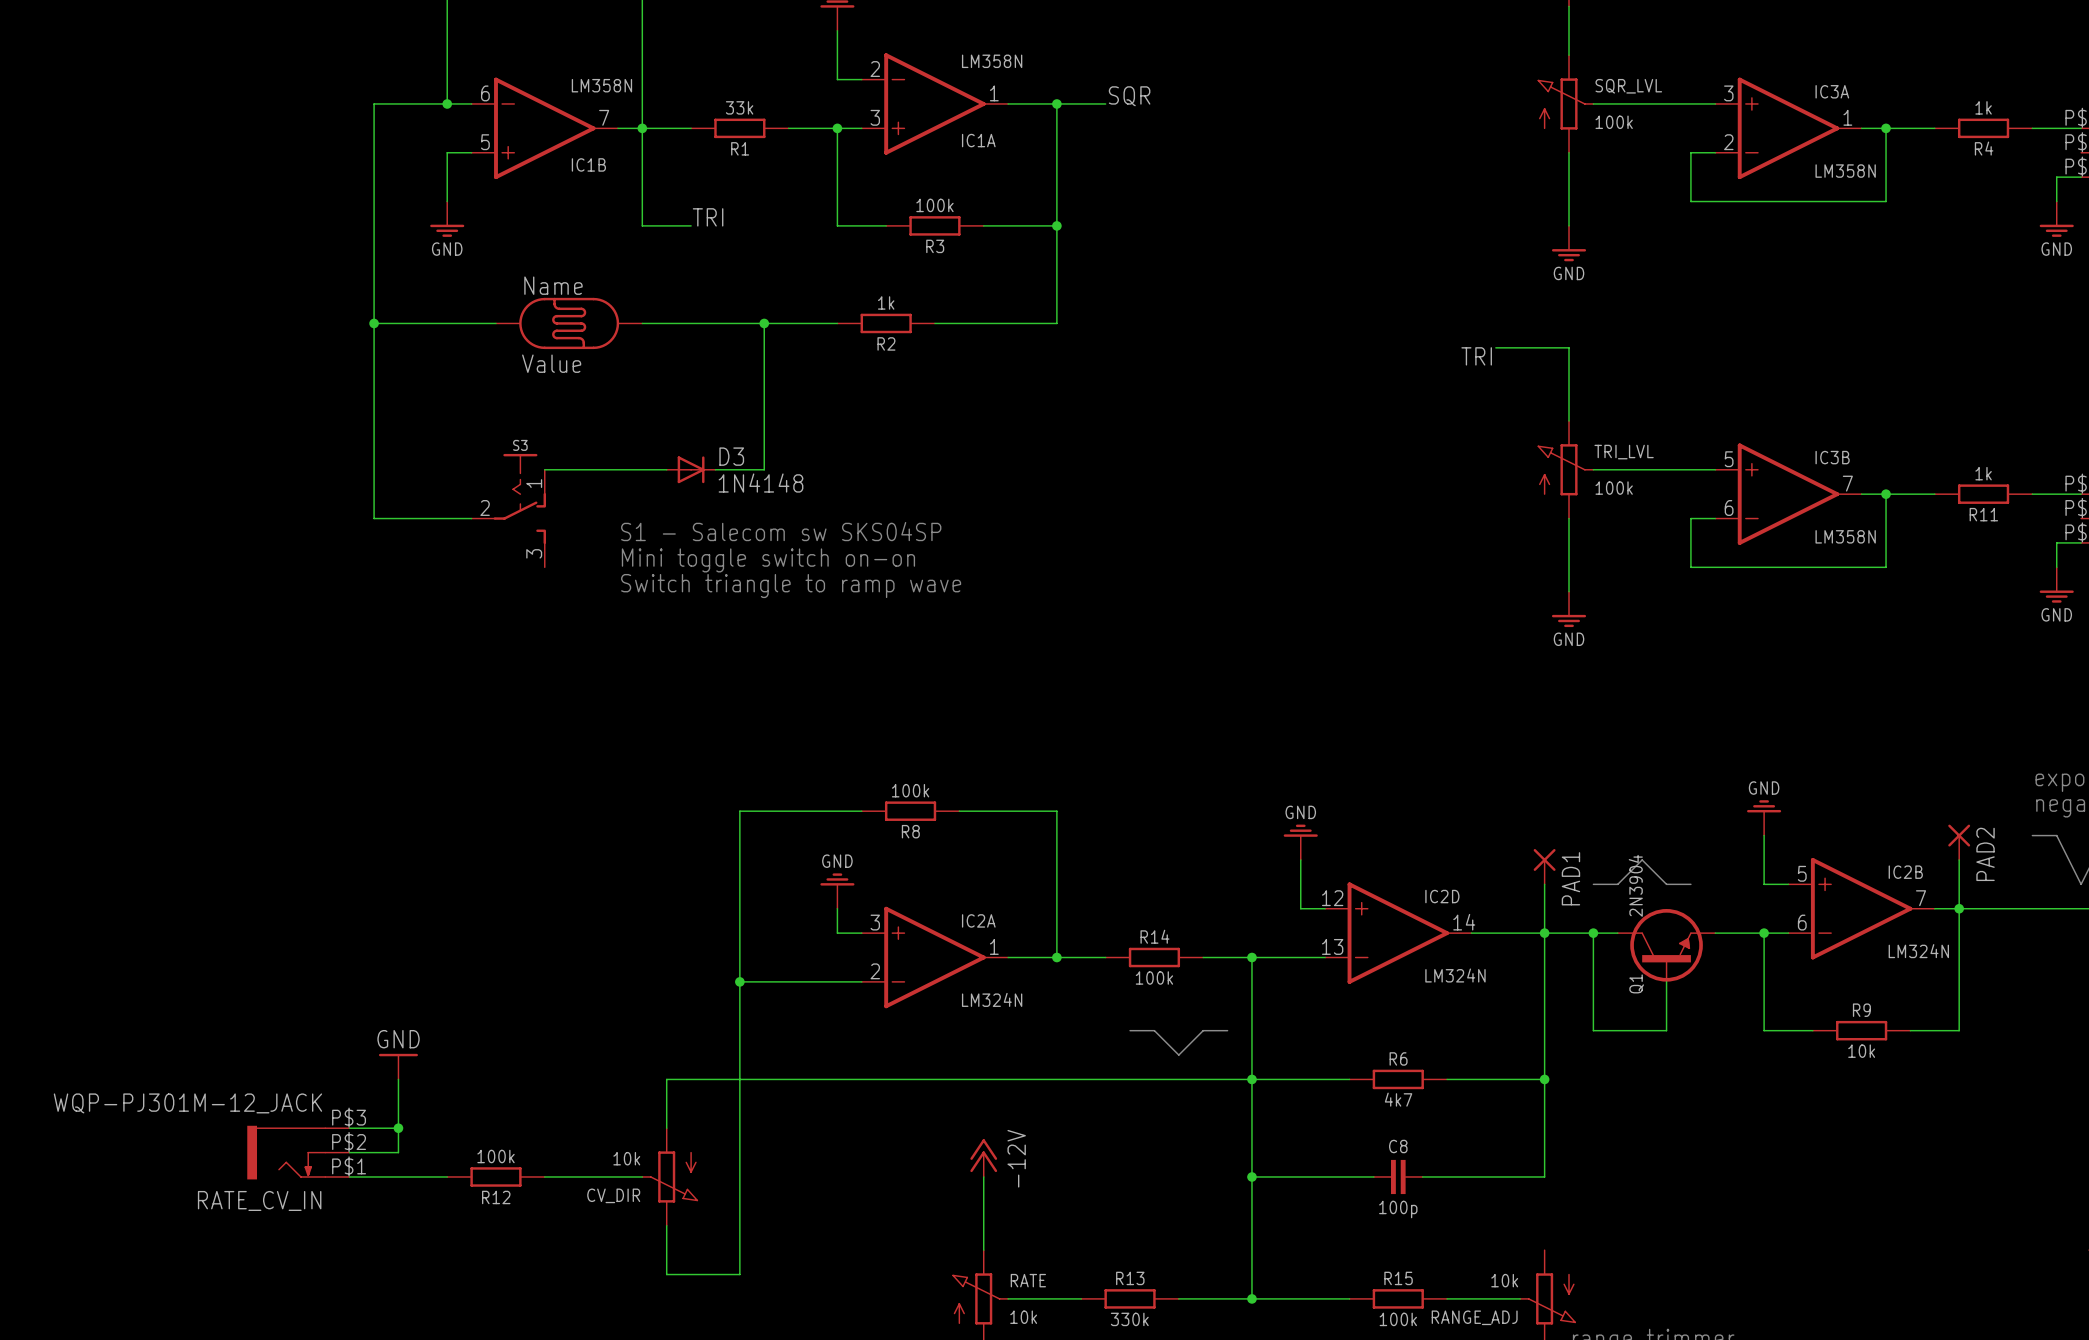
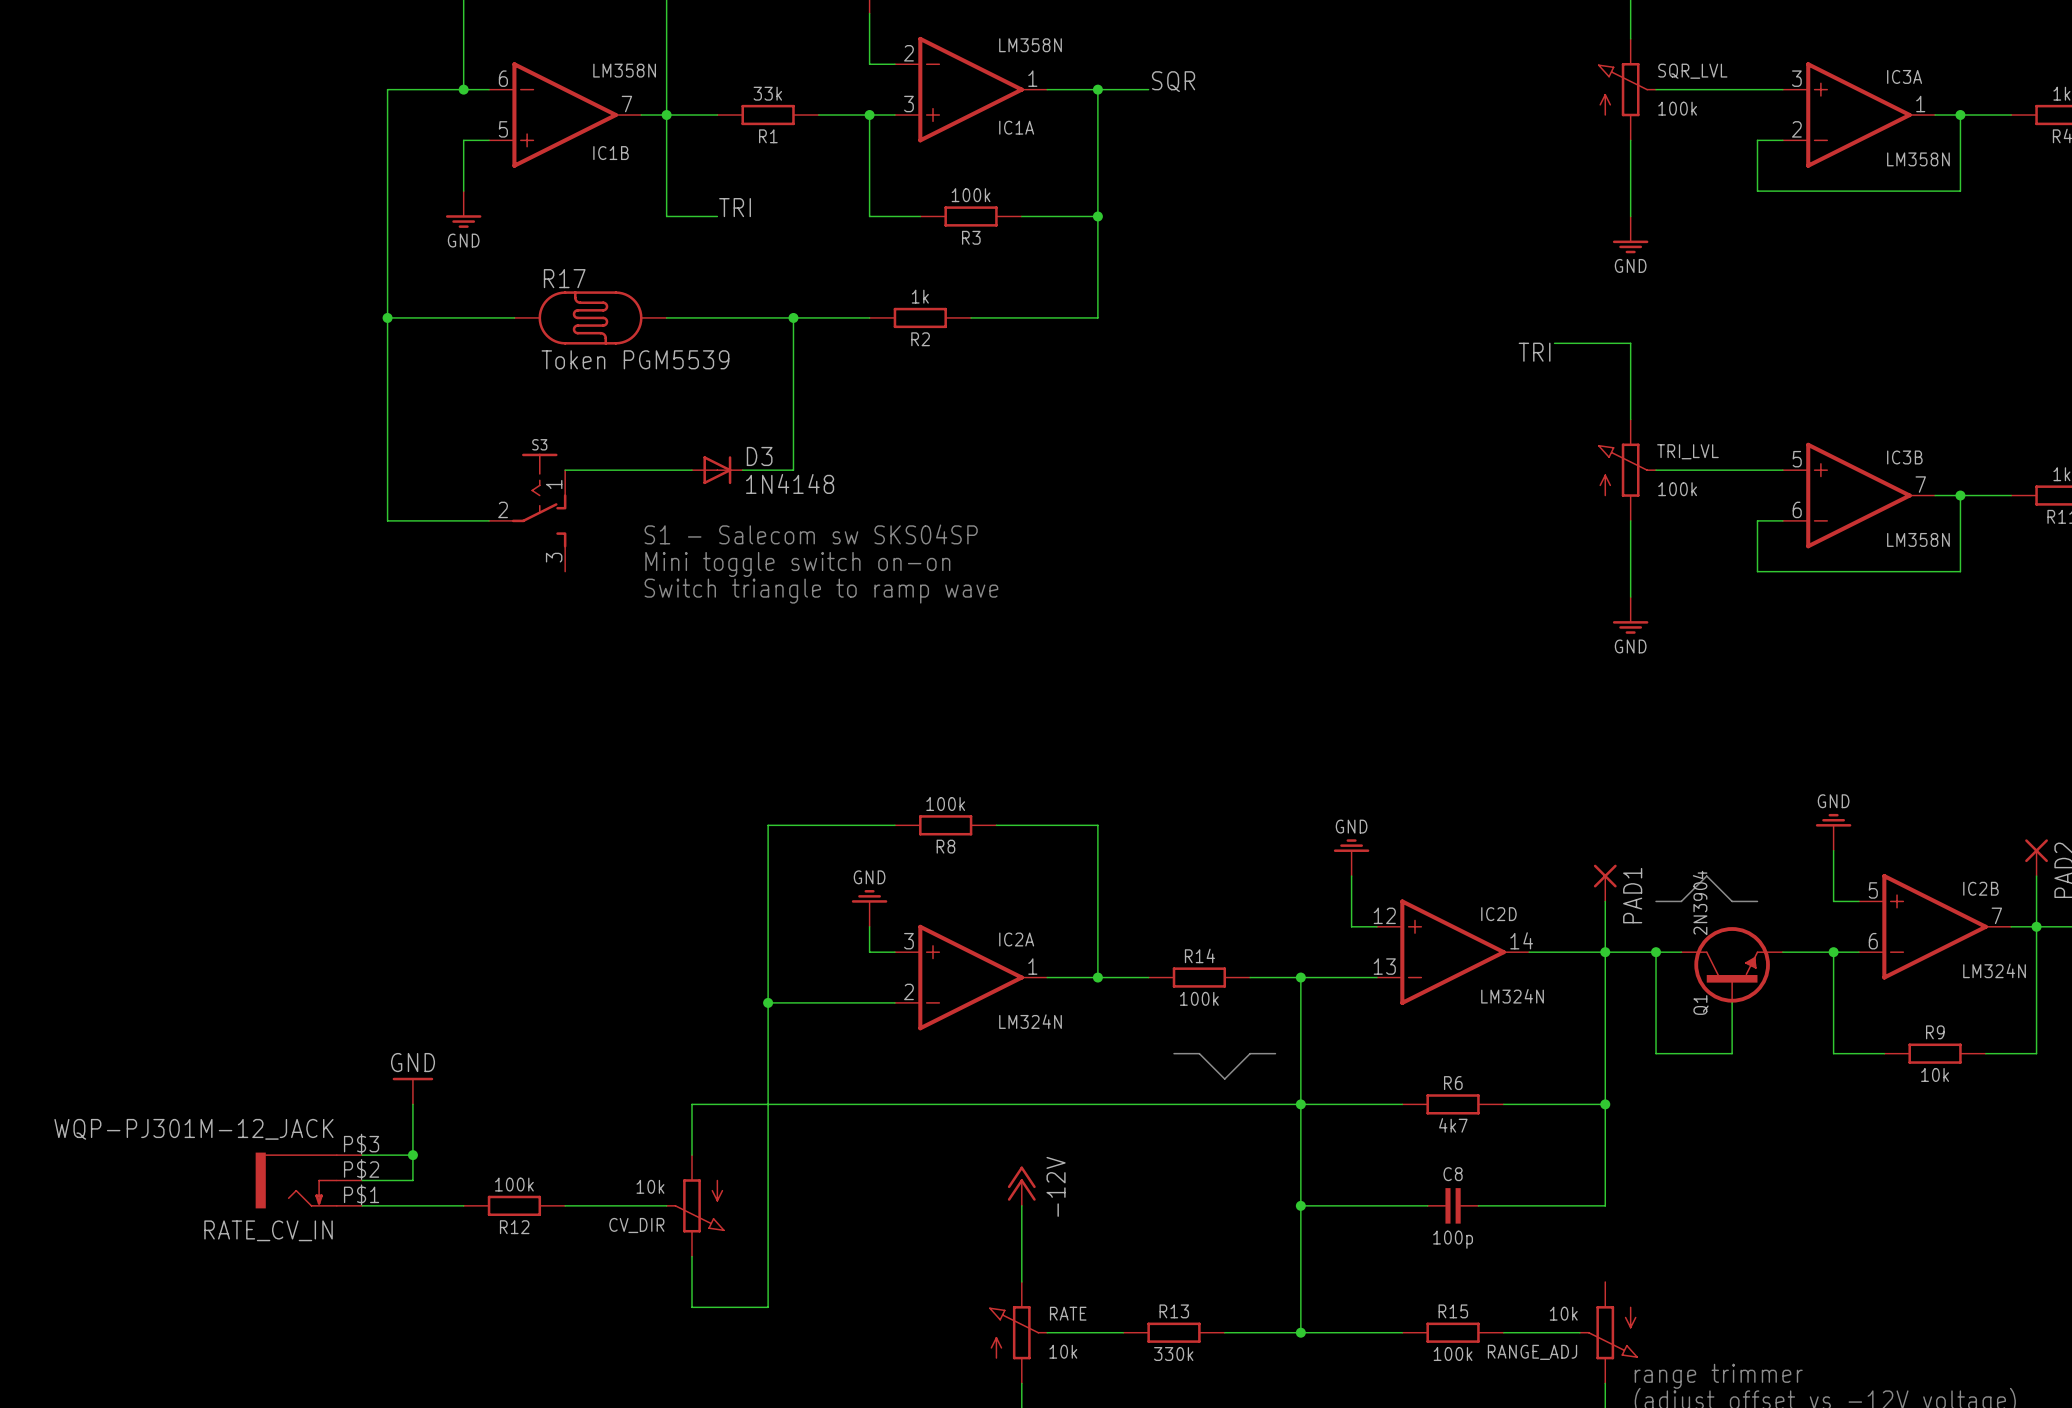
R17 name: none -> R17 (564, 278)
R17 text: Name (553, 285) -> none
R17 text: Value (551, 363) -> none
R17 value: none -> Token PGM5539 (635, 359)

